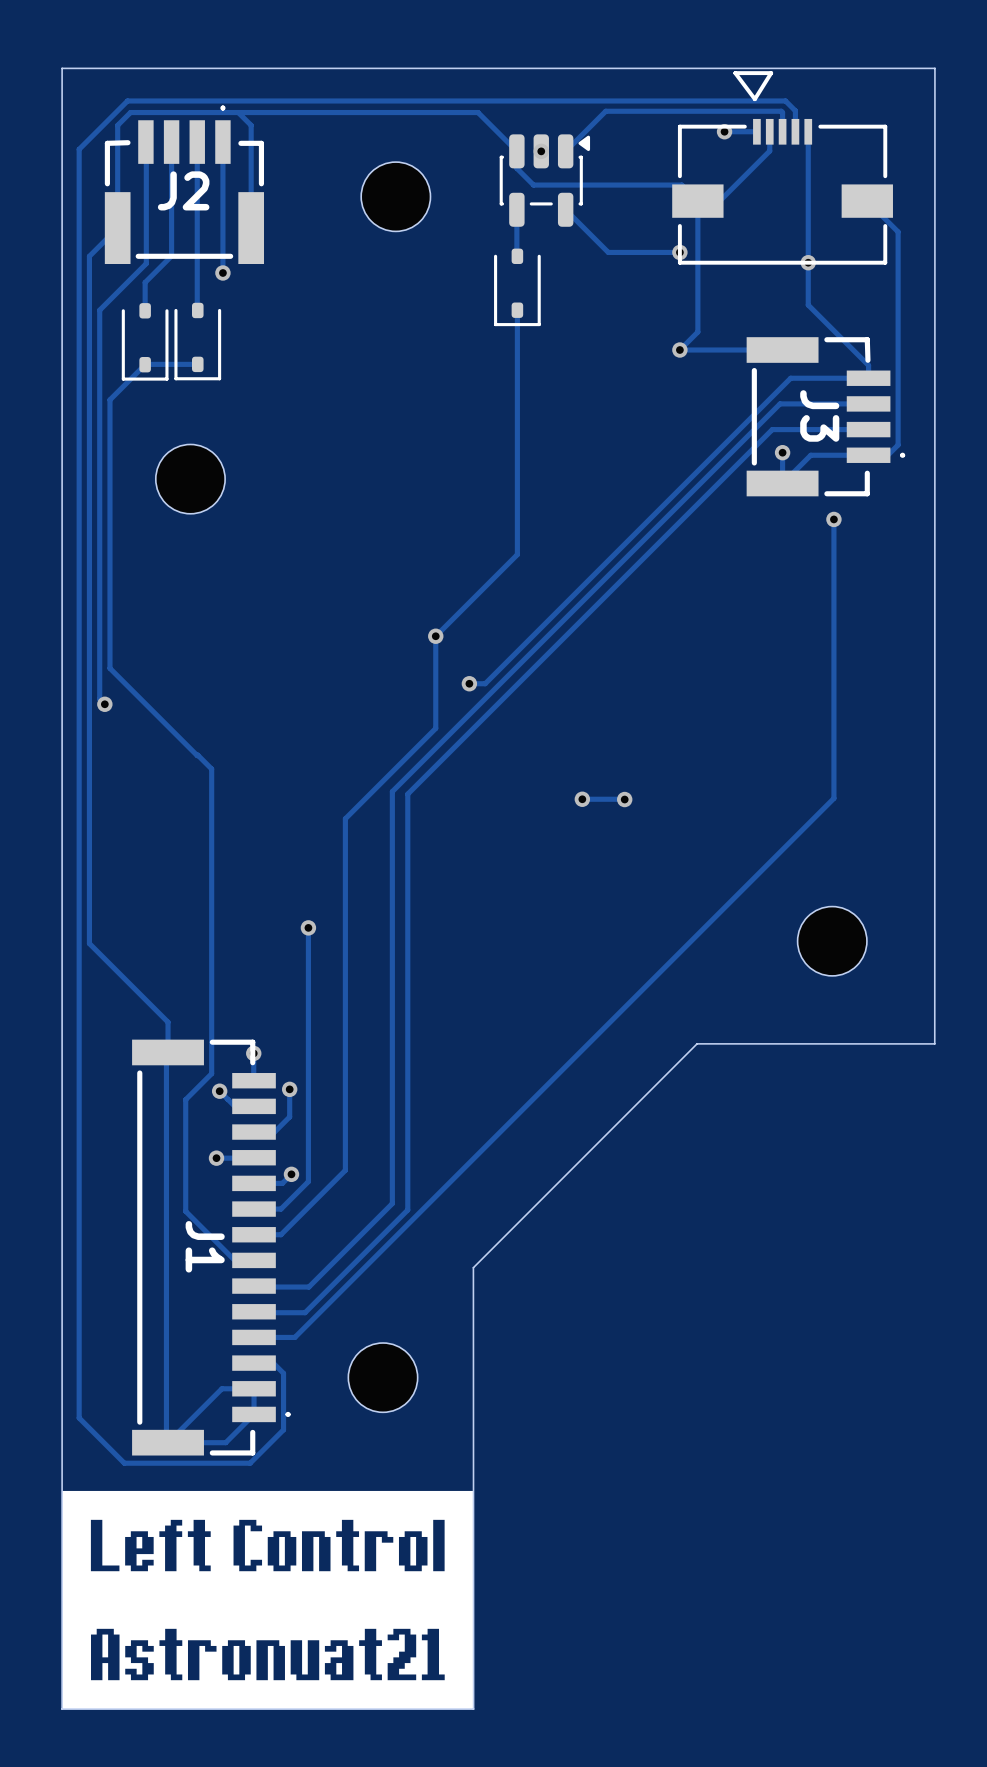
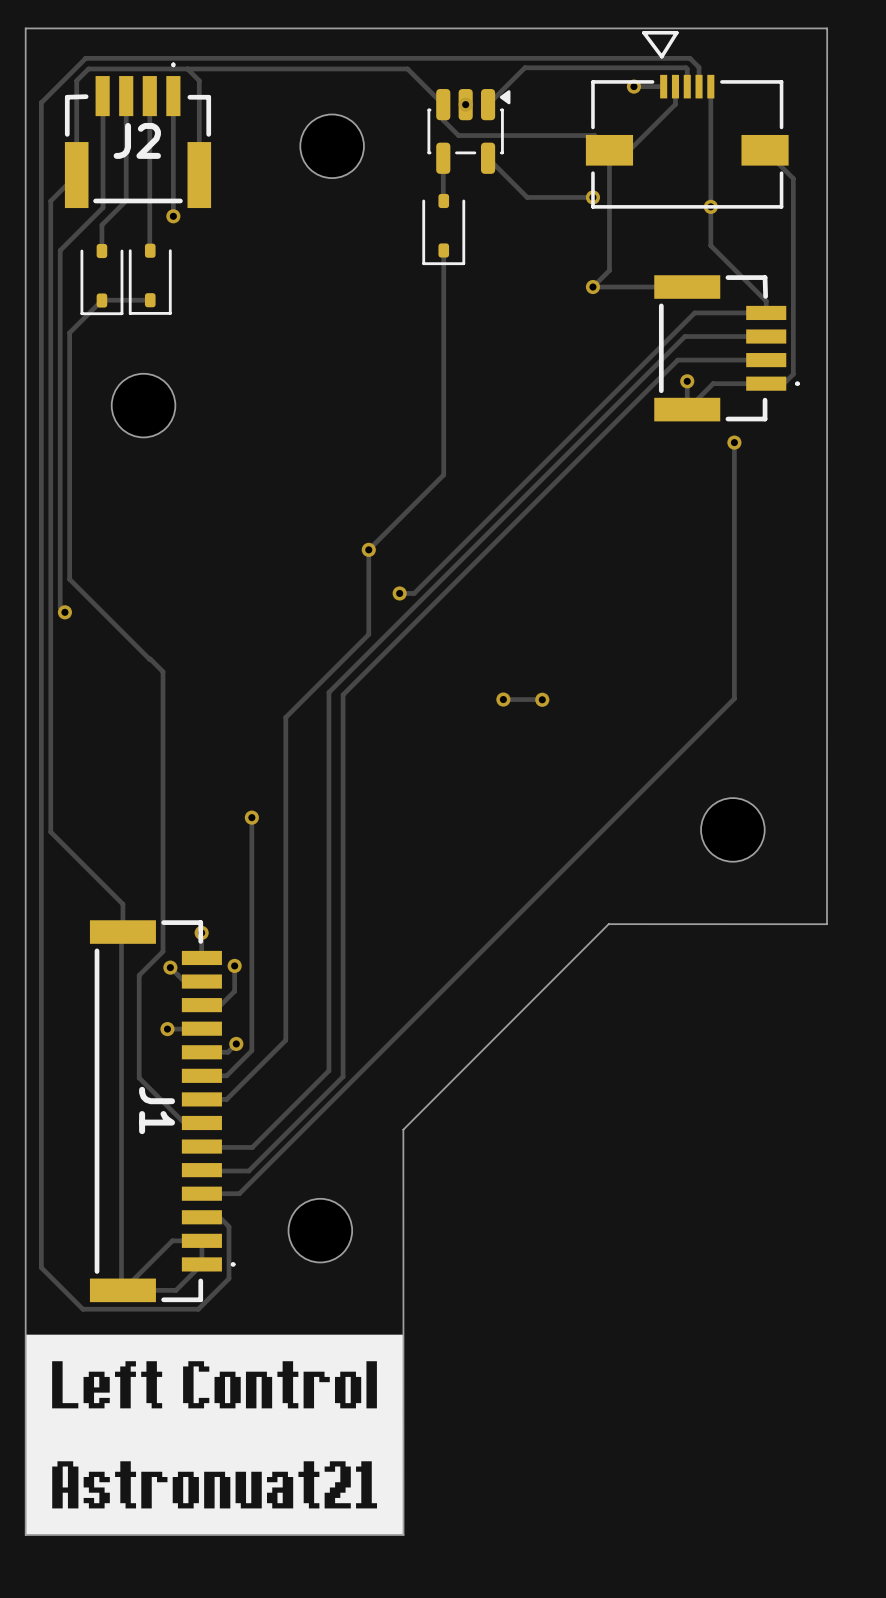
J3 name: J3 (819, 415) -> none

